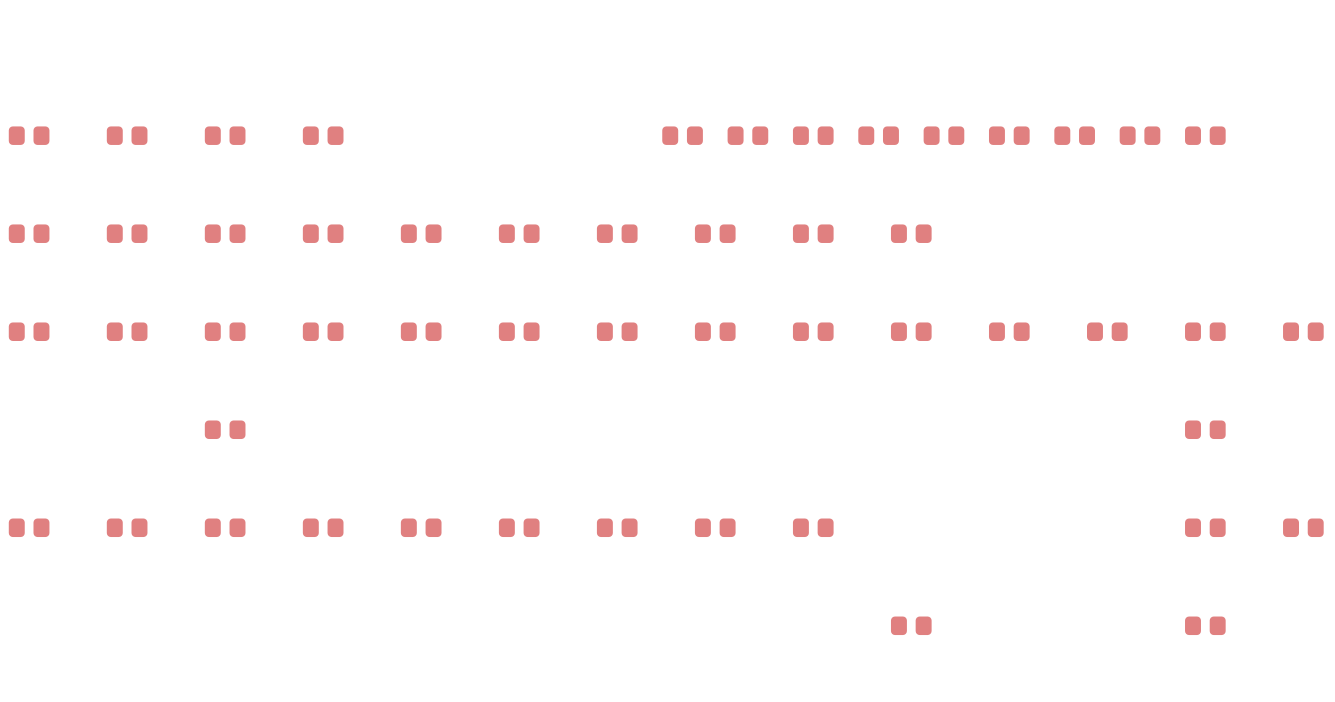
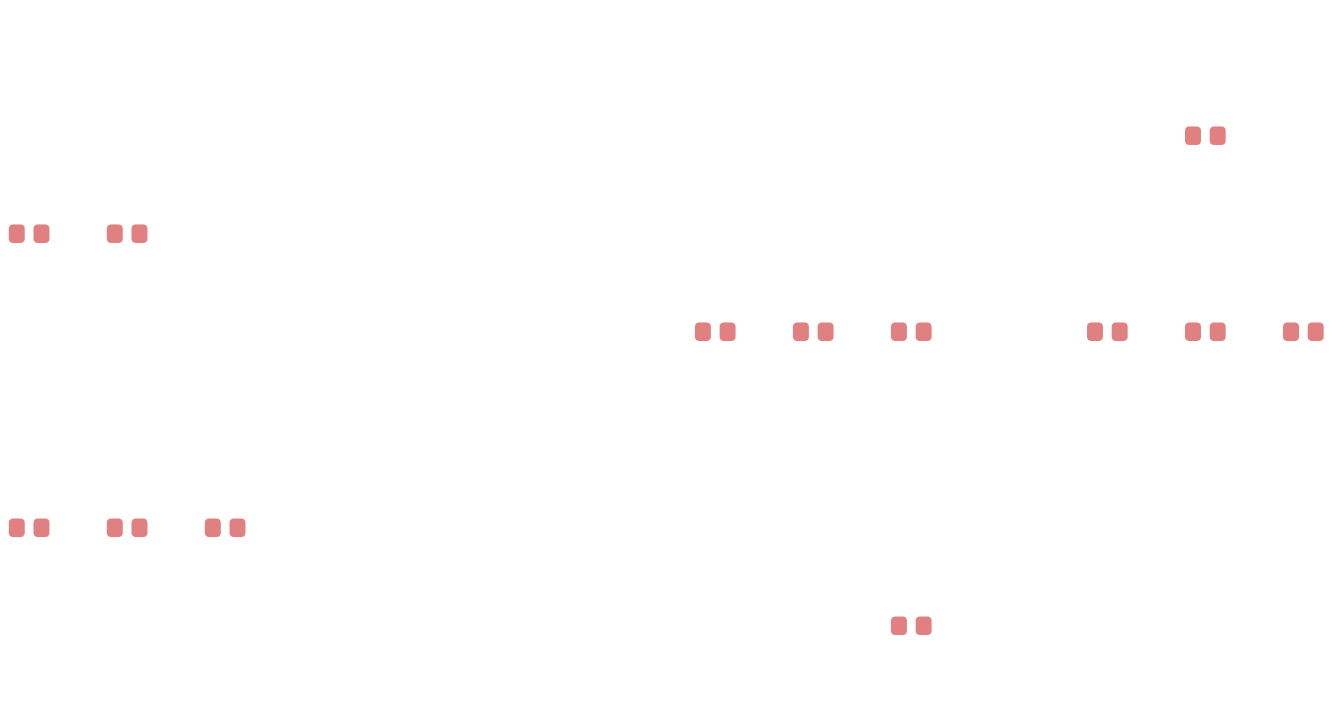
part: (29, 135) -> none
part: (127, 135) -> none
part: (225, 135) -> none
part: (323, 135) -> none
part: (682, 135) -> none
part: (747, 135) -> none
part: (813, 135) -> none
part: (878, 135) -> none
part: (943, 135) -> none
part: (1009, 135) -> none
part: (1074, 135) -> none
part: (1139, 135) -> none
part: (225, 233) -> none
part: (323, 233) -> none
part: (421, 233) -> none
part: (519, 233) -> none
part: (617, 233) -> none
part: (715, 233) -> none
part: (813, 233) -> none
part: (911, 233) -> none
part: (29, 331) -> none
part: (127, 331) -> none
part: (225, 331) -> none
part: (323, 331) -> none
part: (421, 331) -> none
part: (519, 331) -> none
part: (617, 331) -> none
part: (1009, 331) -> none
part: (225, 429) -> none
part: (1205, 429) -> none
part: (323, 527) -> none
part: (421, 527) -> none
part: (519, 527) -> none
part: (617, 527) -> none
part: (715, 527) -> none
part: (813, 527) -> none
part: (1205, 527) -> none
part: (1303, 527) -> none
part: (1205, 625) -> none

